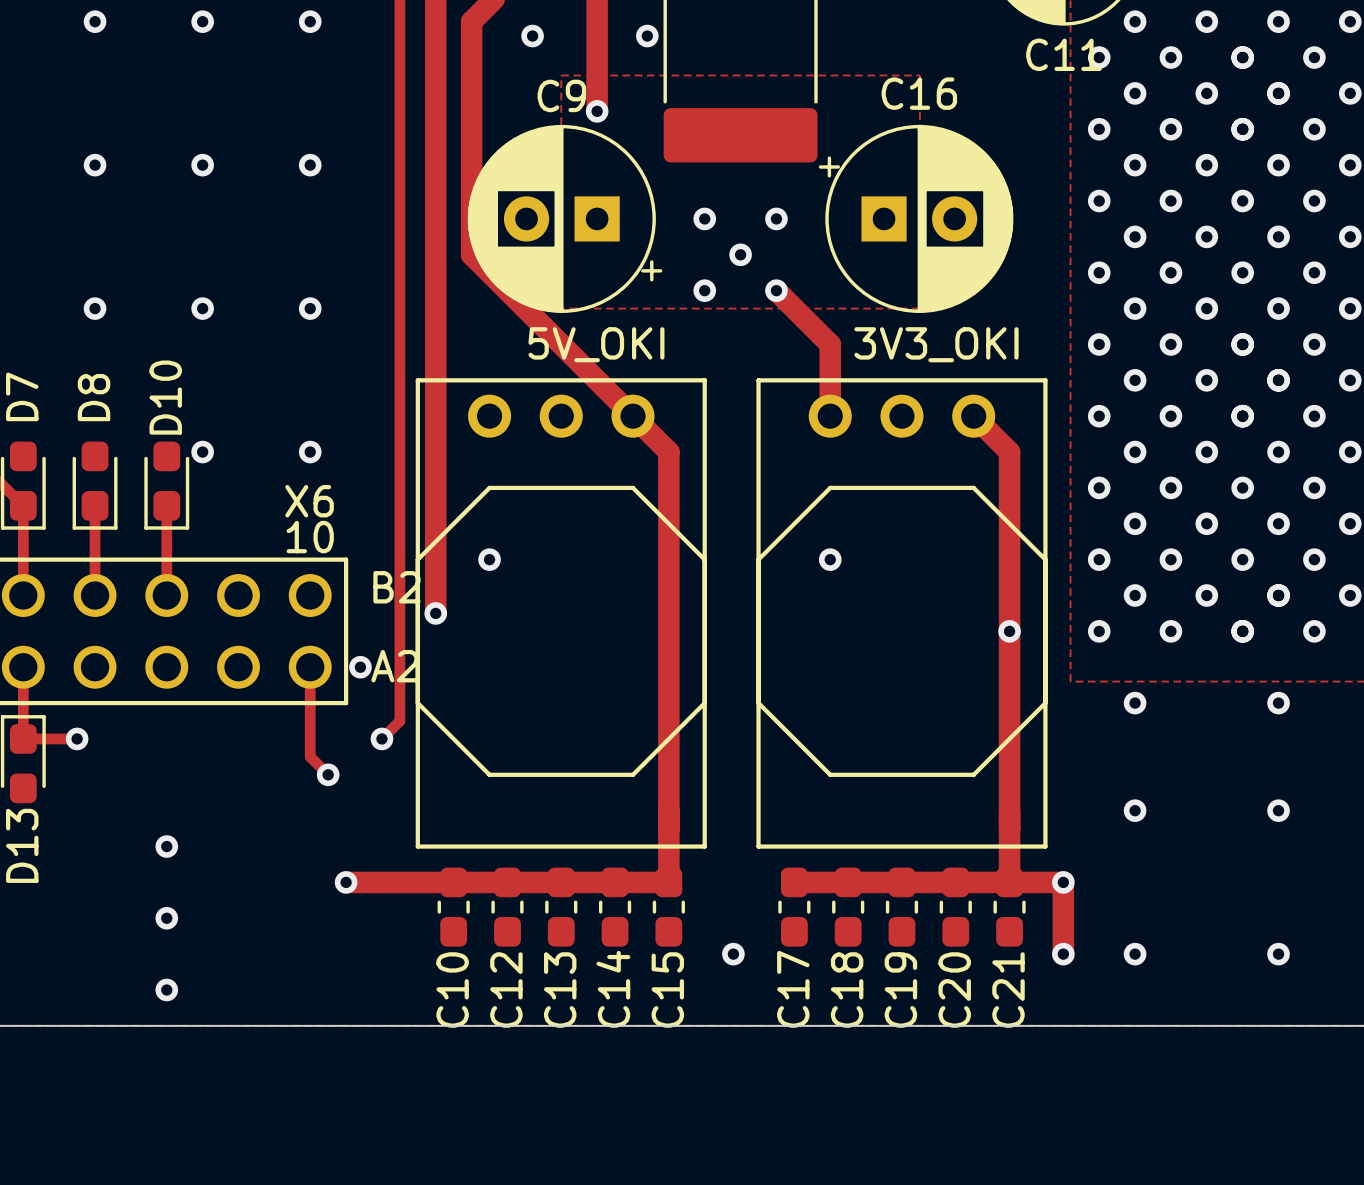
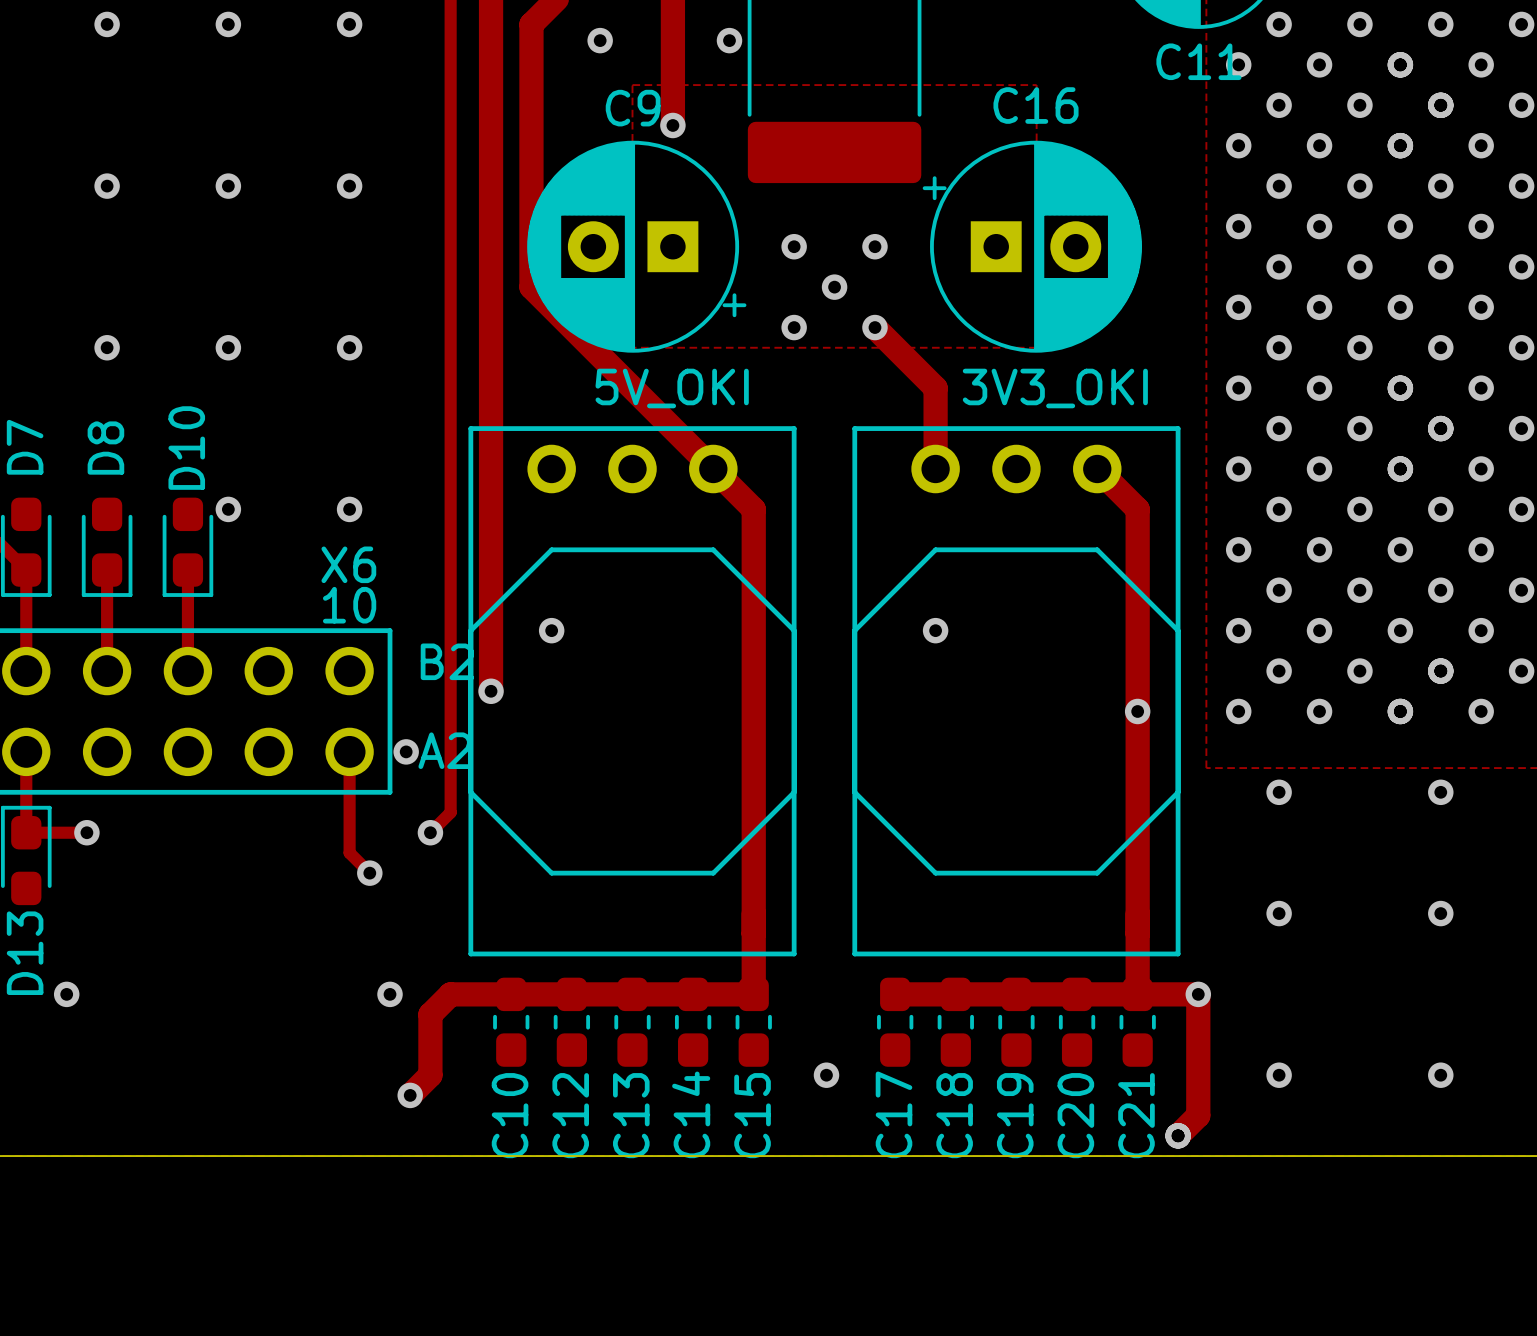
via: (166, 846) -> none
via: none -> (66, 994)
track: (346, 882) (399, 882) -> (410, 1095) (430, 1075) (430, 1014) (450, 994)
via: (166, 918) -> none
track: none -> (1198, 1075) (1198, 1115) (1178, 1135)
via position: (1063, 954) -> (1178, 1135)
via: none -> (410, 1095)
via: (166, 989) -> none

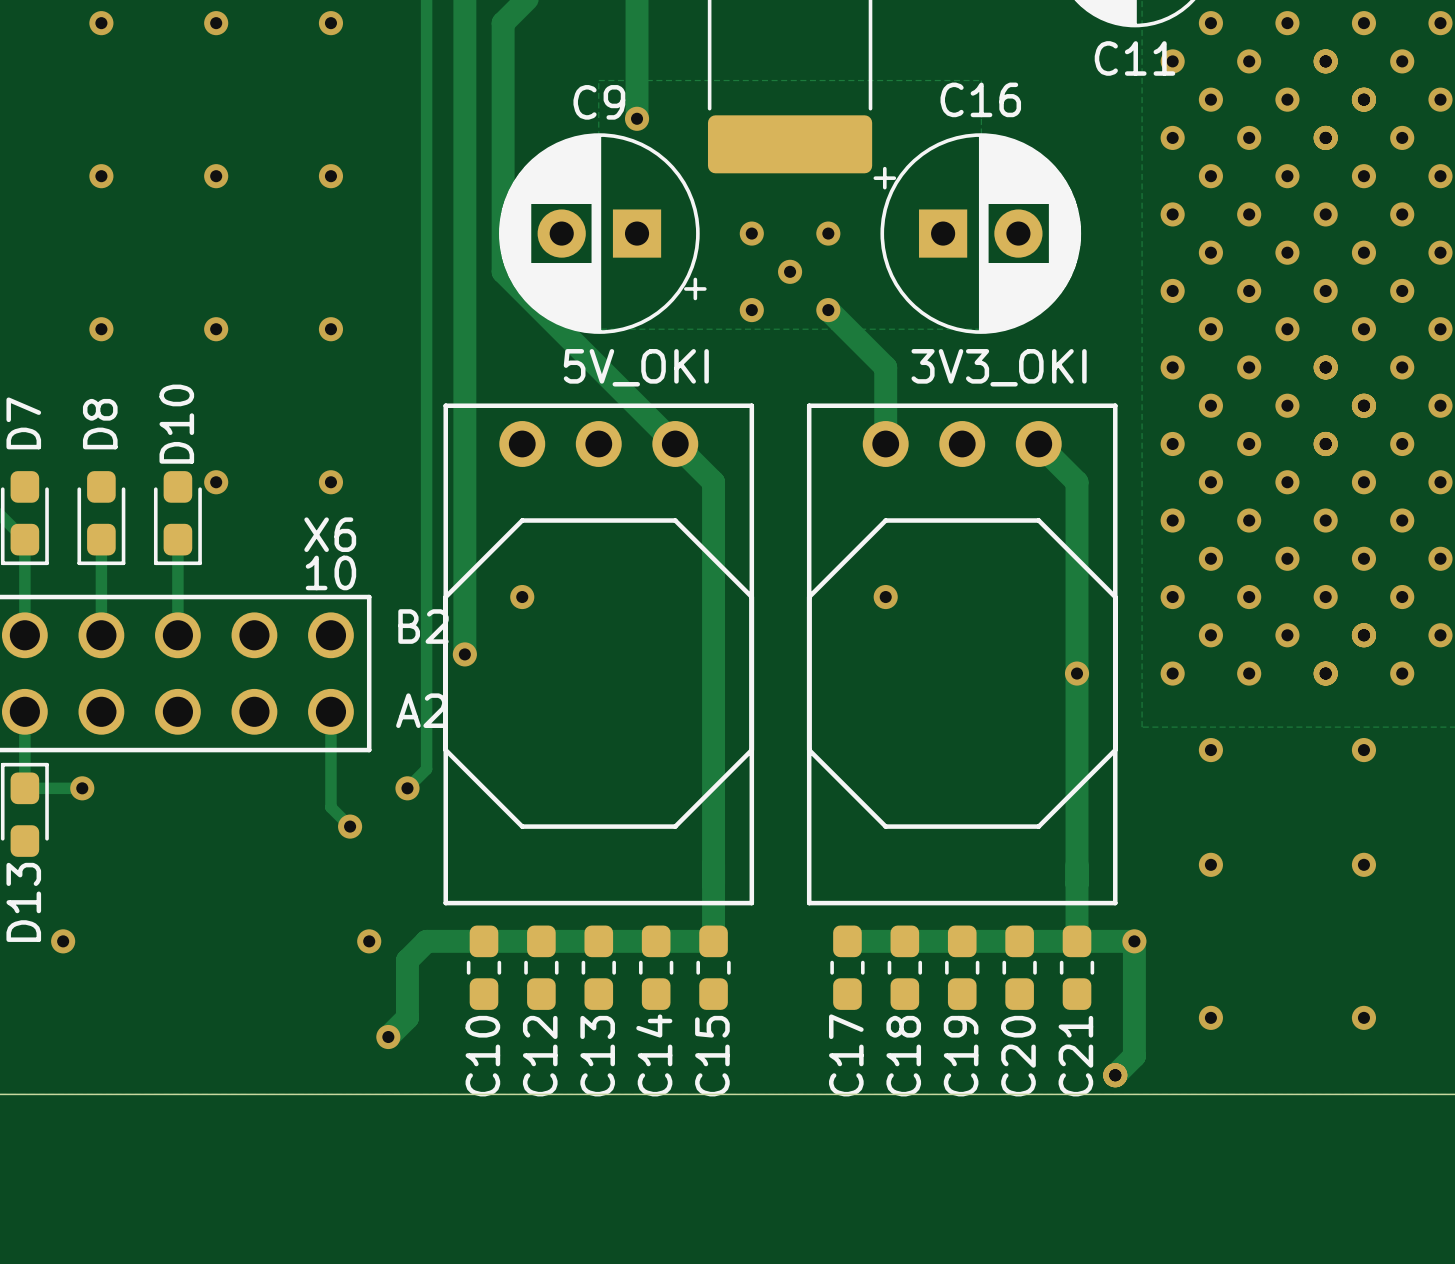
via: (600, 40) -> none
via: (729, 40) -> none
via: (406, 751) -> none
via: (826, 1075) -> none

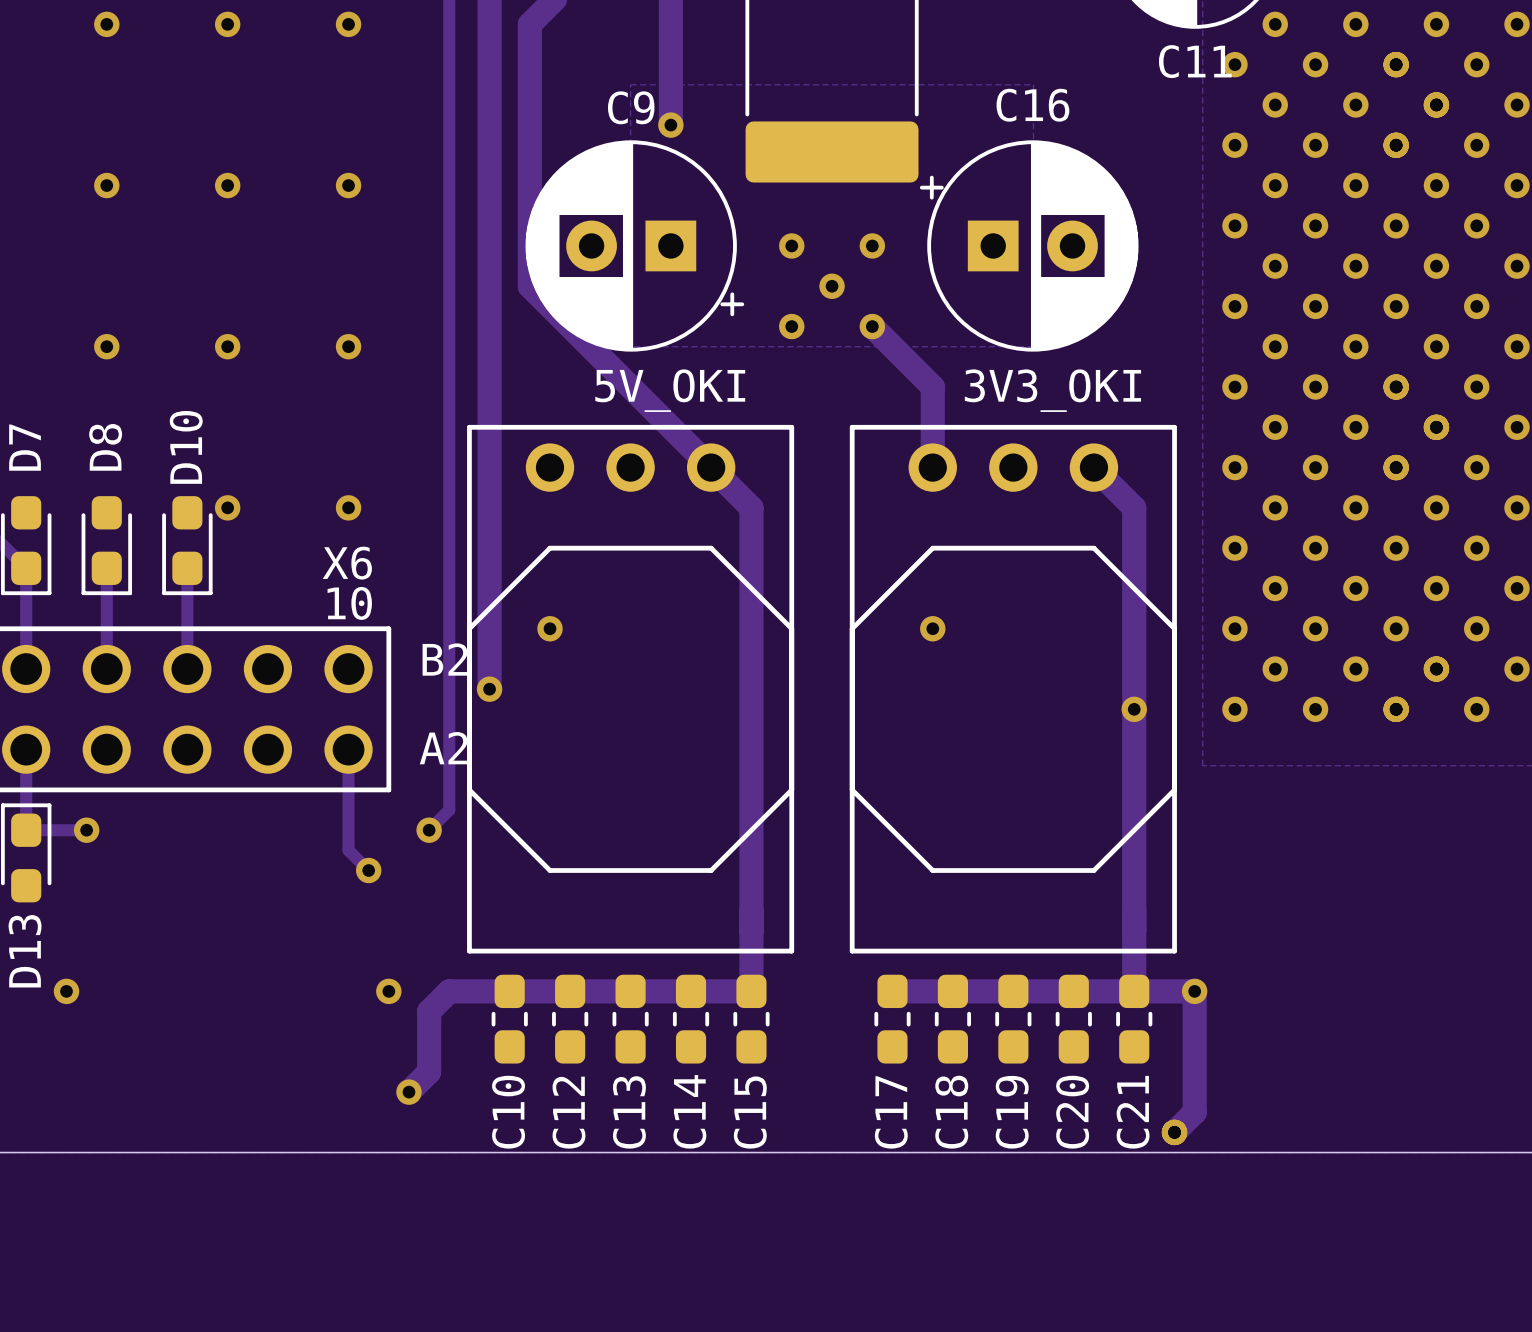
via: (1210, 750) -> none
via: (1363, 750) -> none
via: (1210, 864) -> none
via: (1363, 864) -> none
via: (1210, 1017) -> none
via: (1363, 1017) -> none

